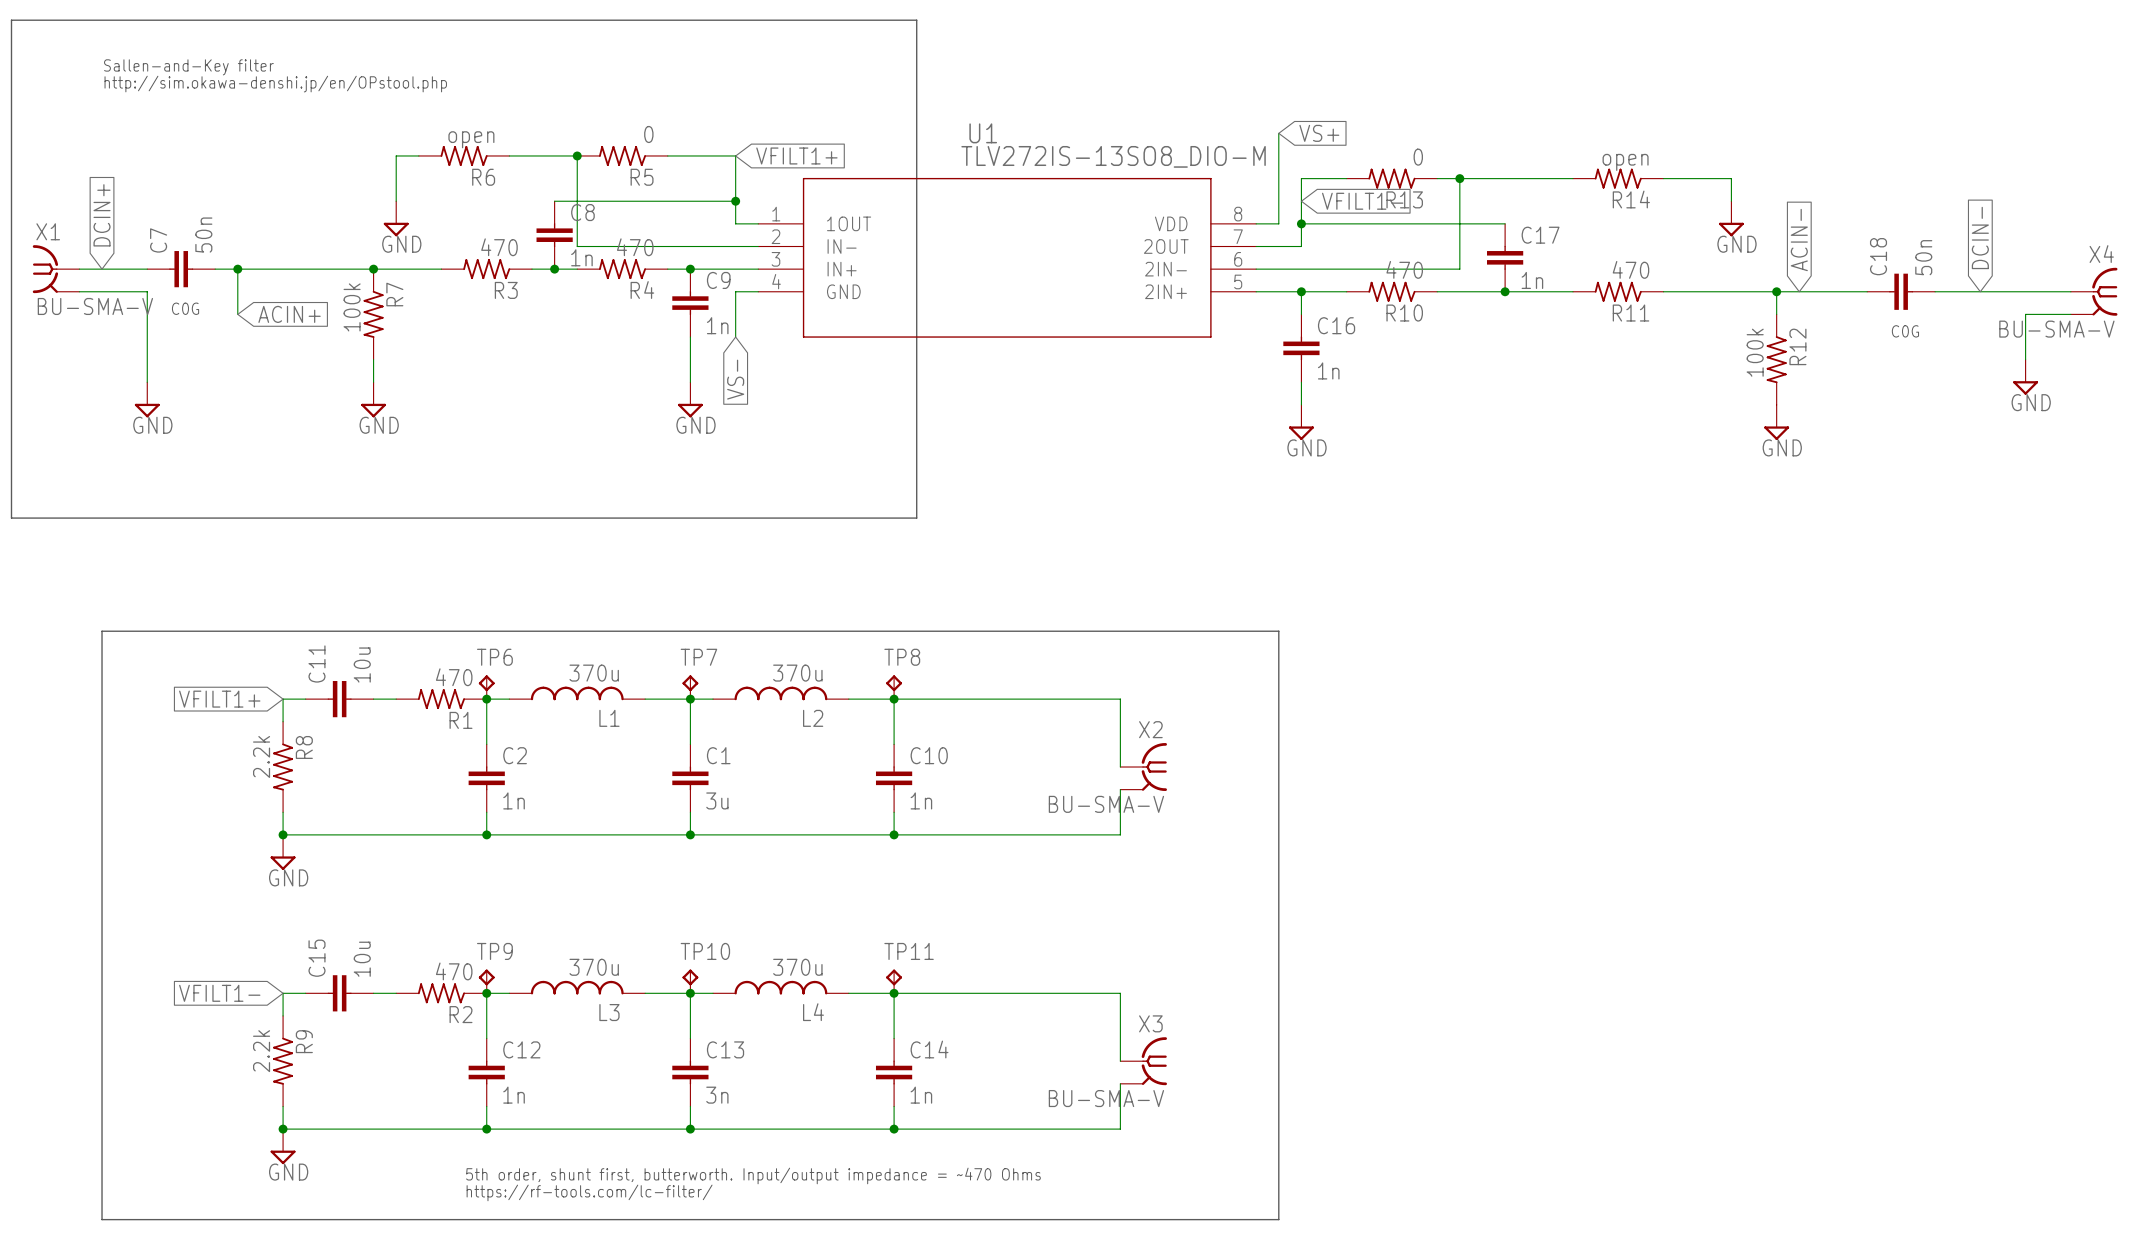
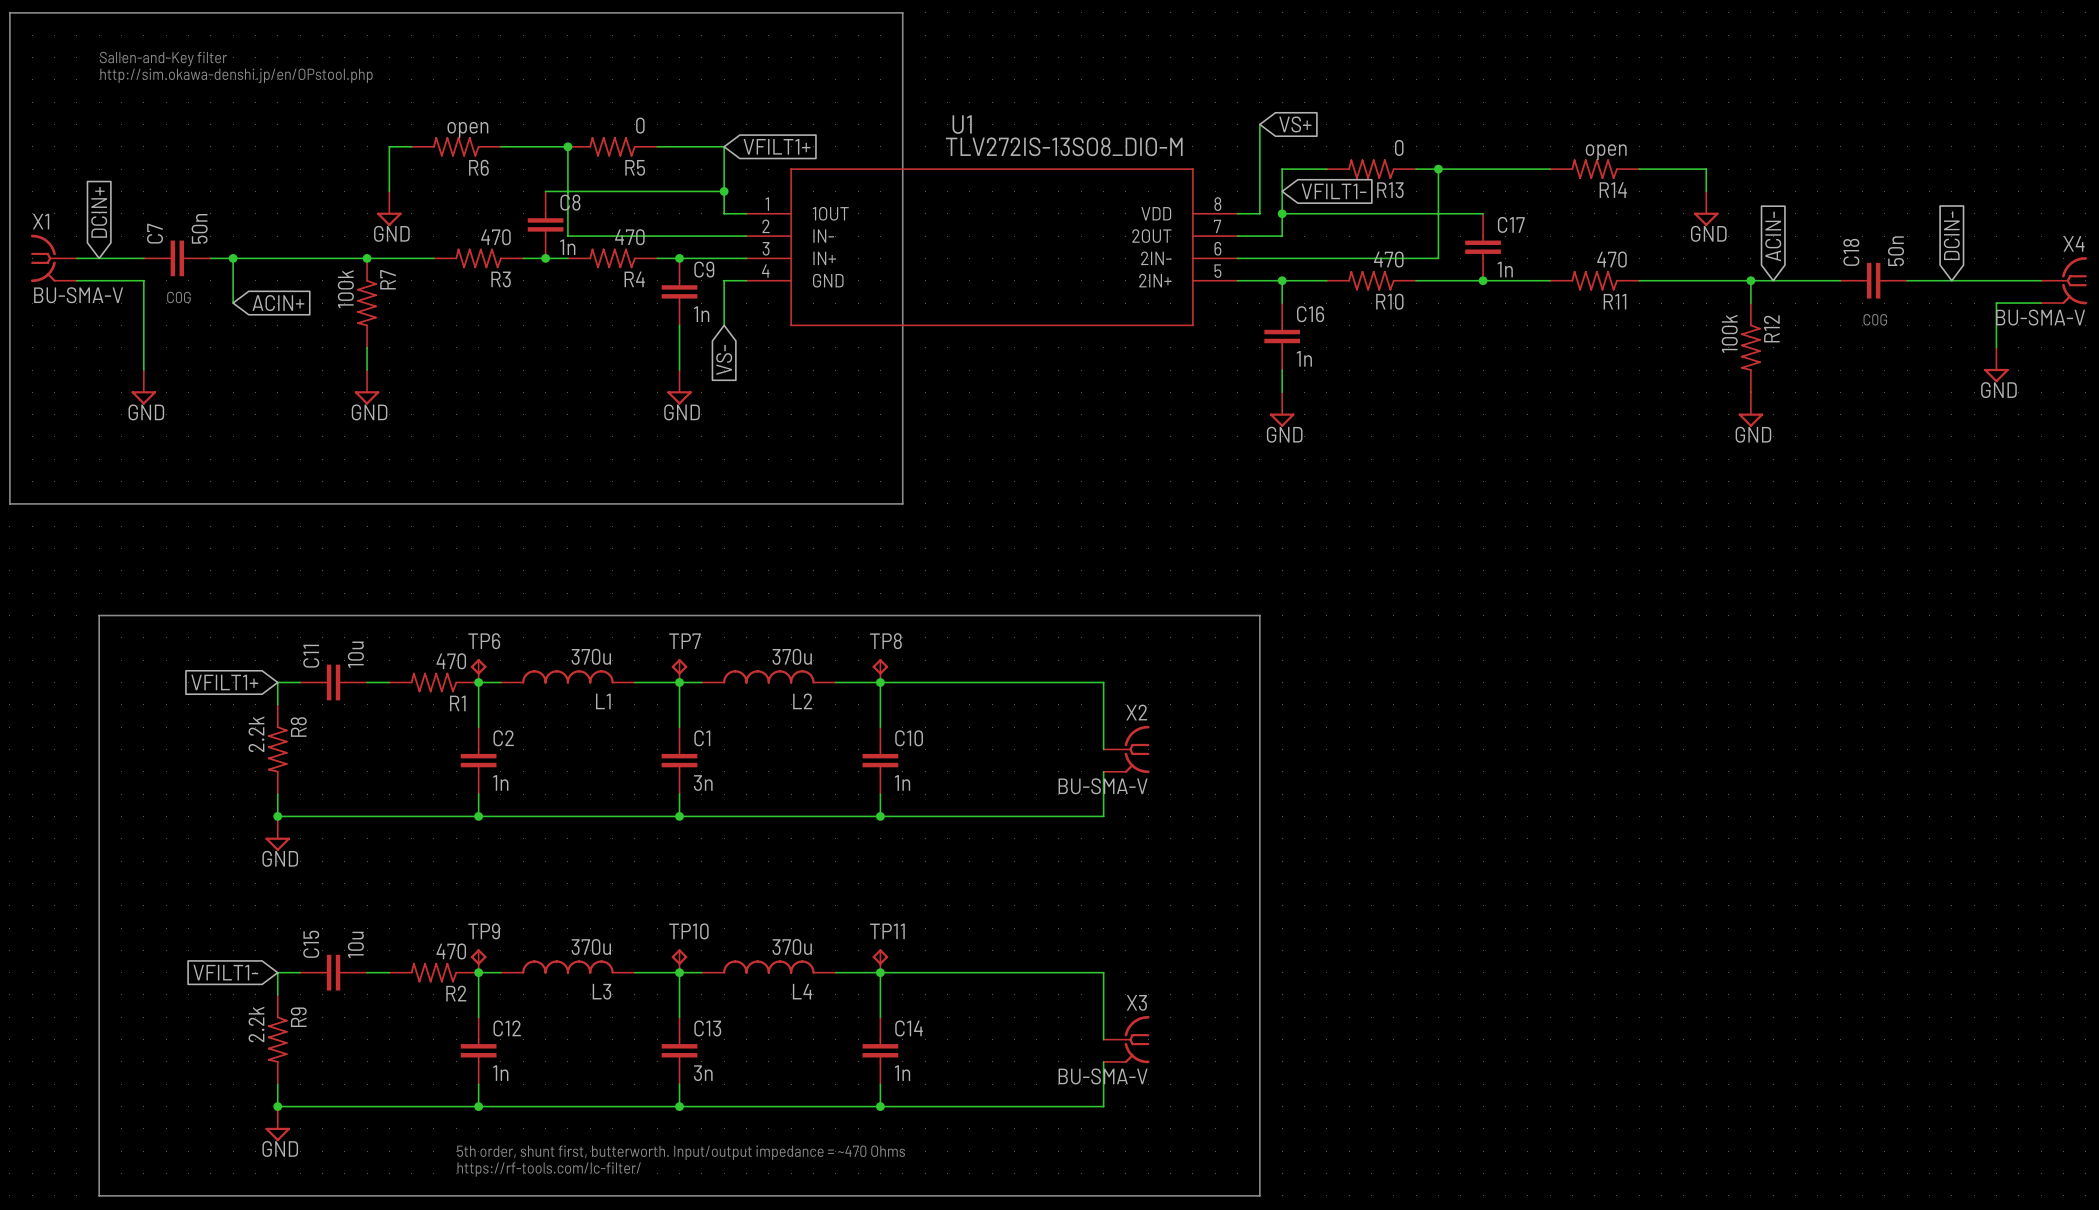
C1 value: 3u (717, 800) -> 3n (703, 783)

